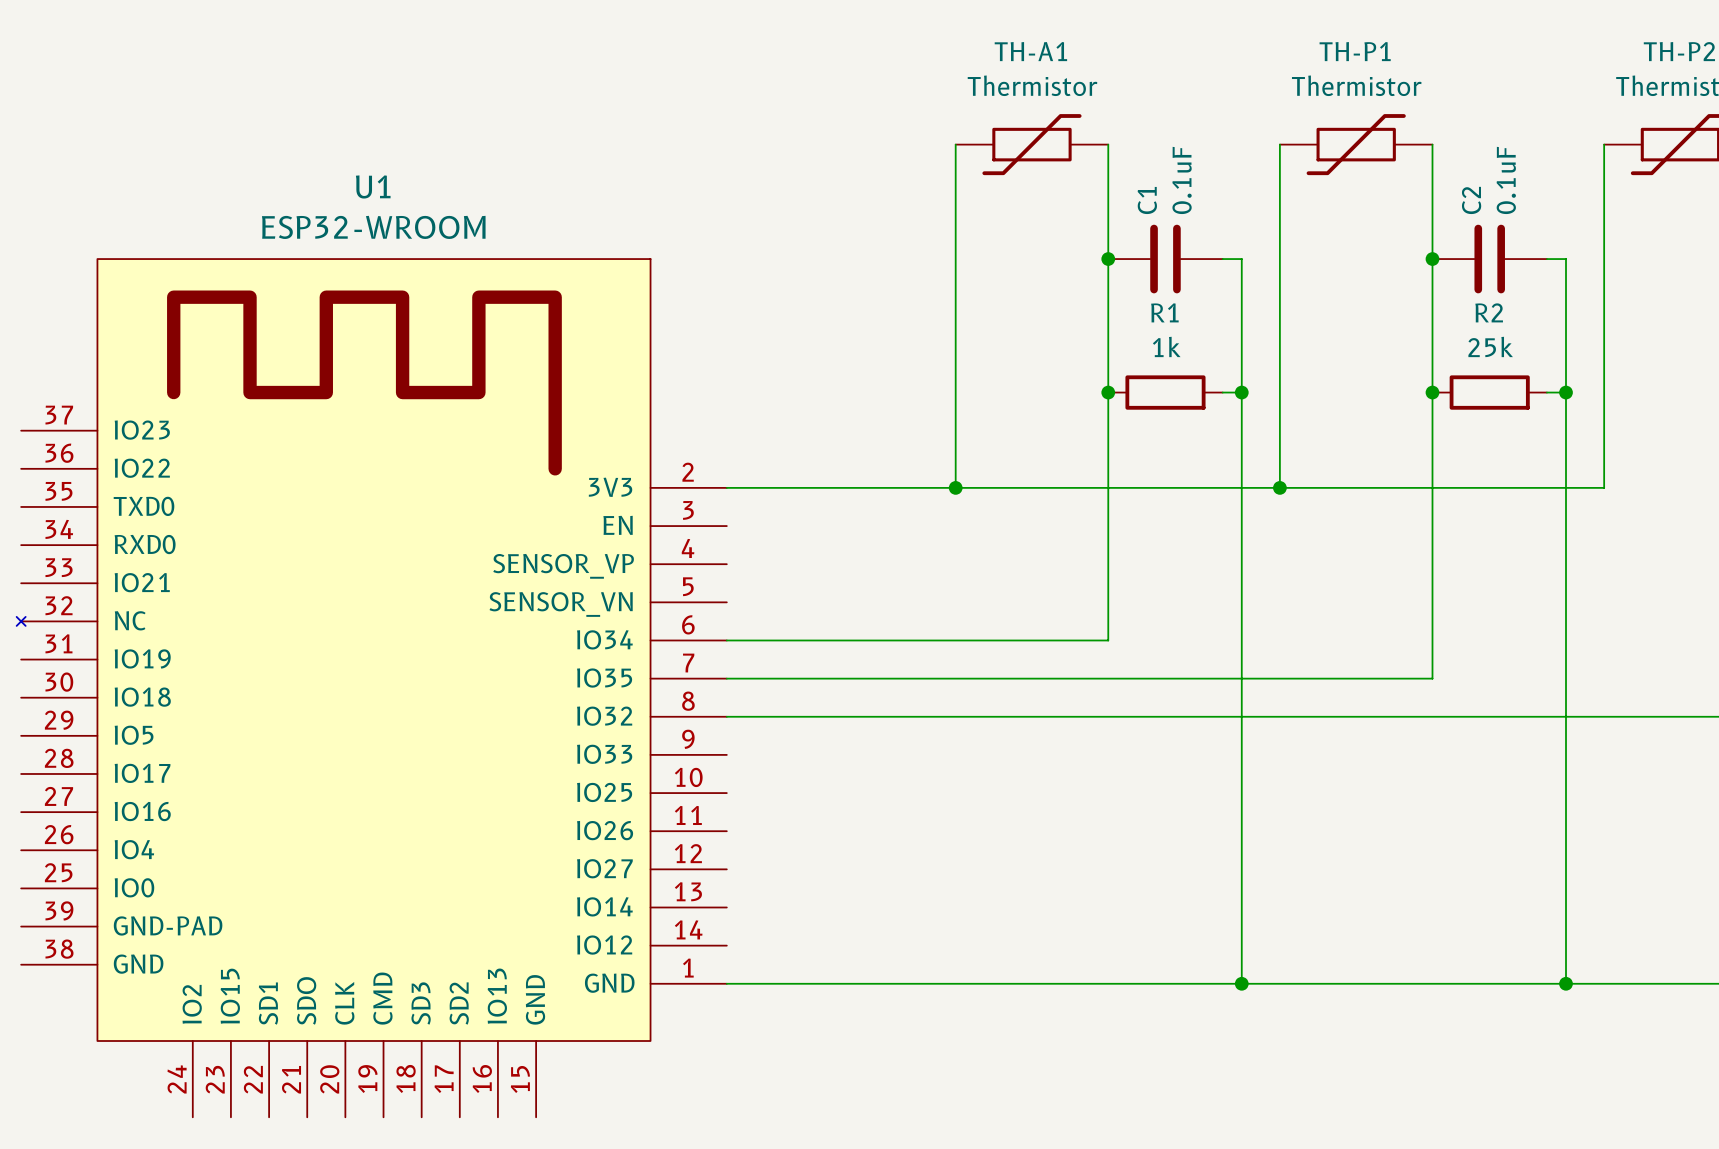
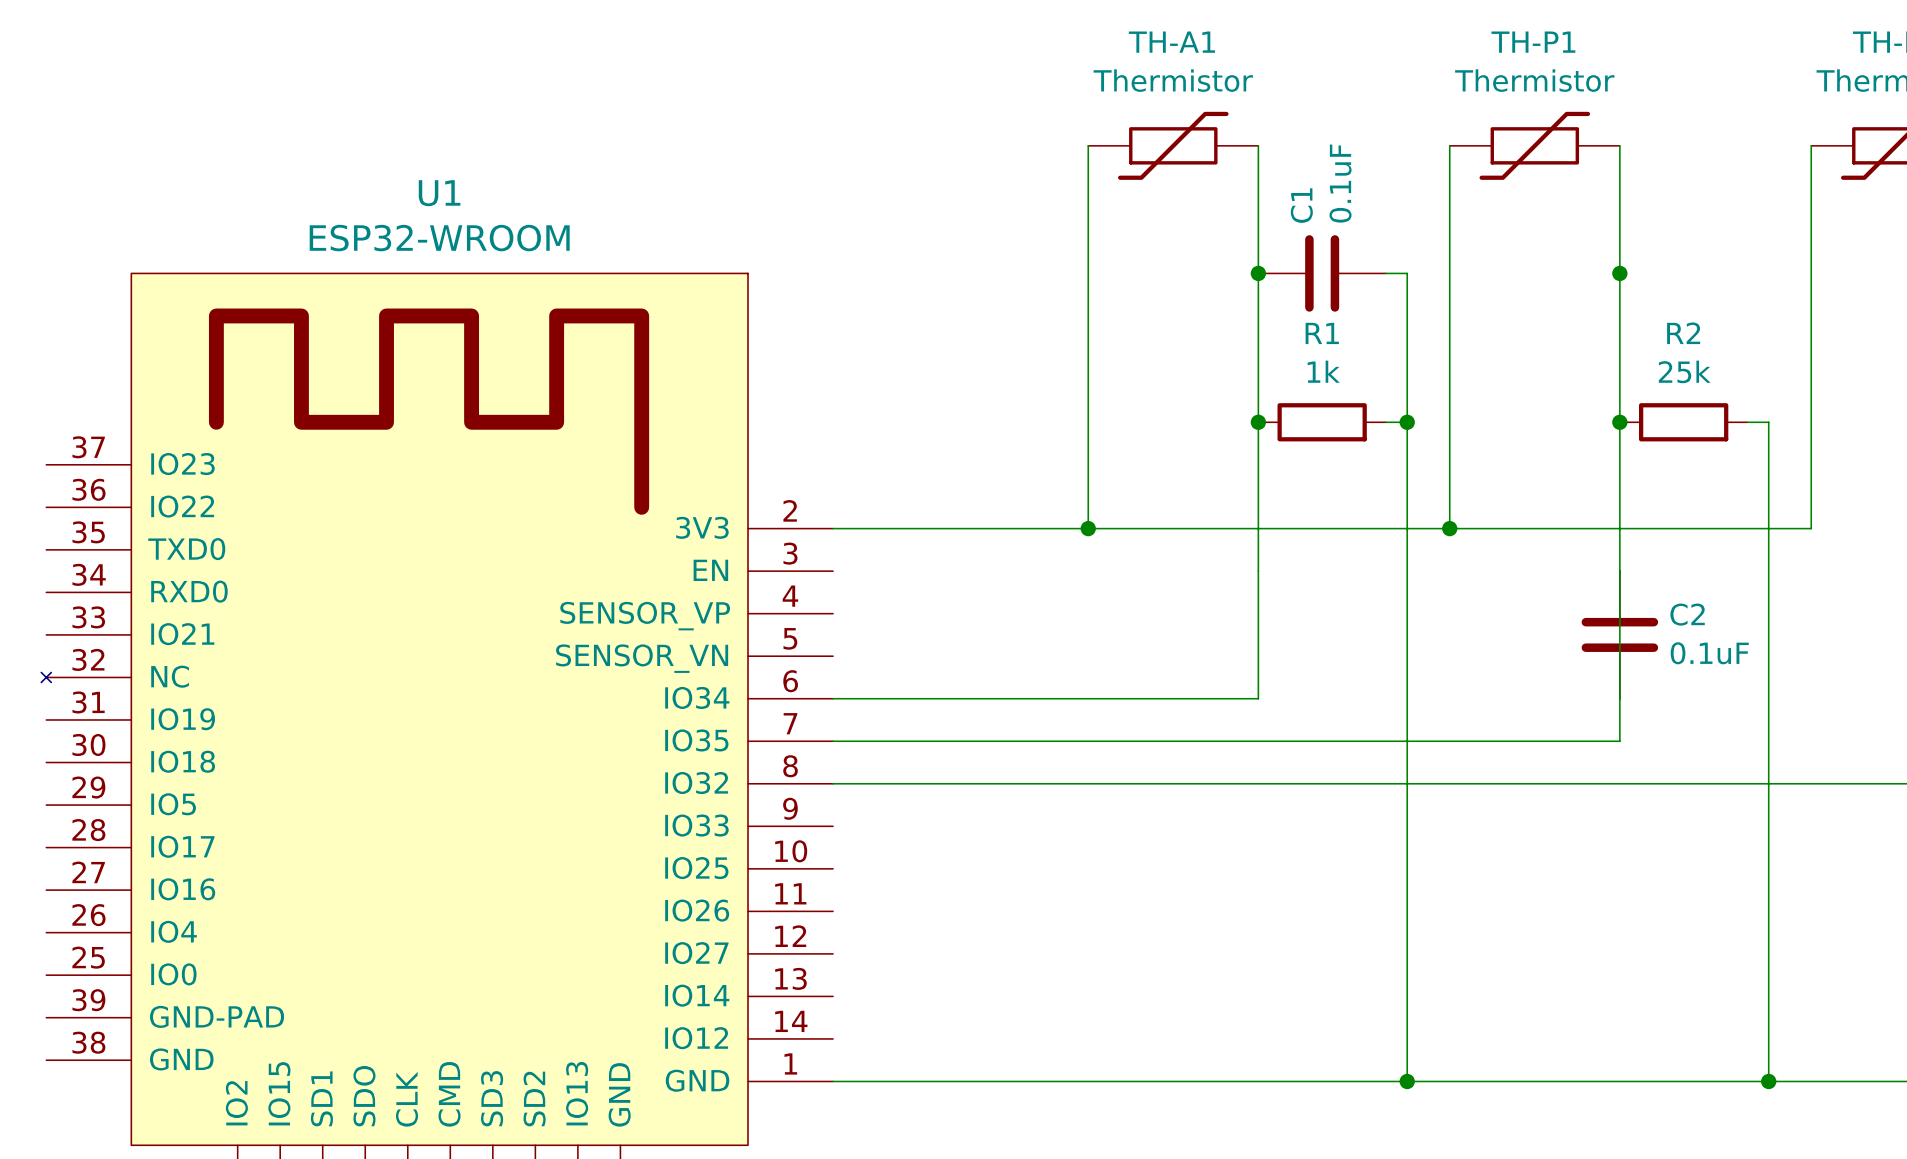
C2 rotation: 0° (1489, 259) -> 90° clockwise (1619, 634)
C2 position: (1489, 259) -> (1619, 634)
wire: (1546, 259) (1566, 259) (1566, 392) -> none
junction: (1566, 392) -> none

